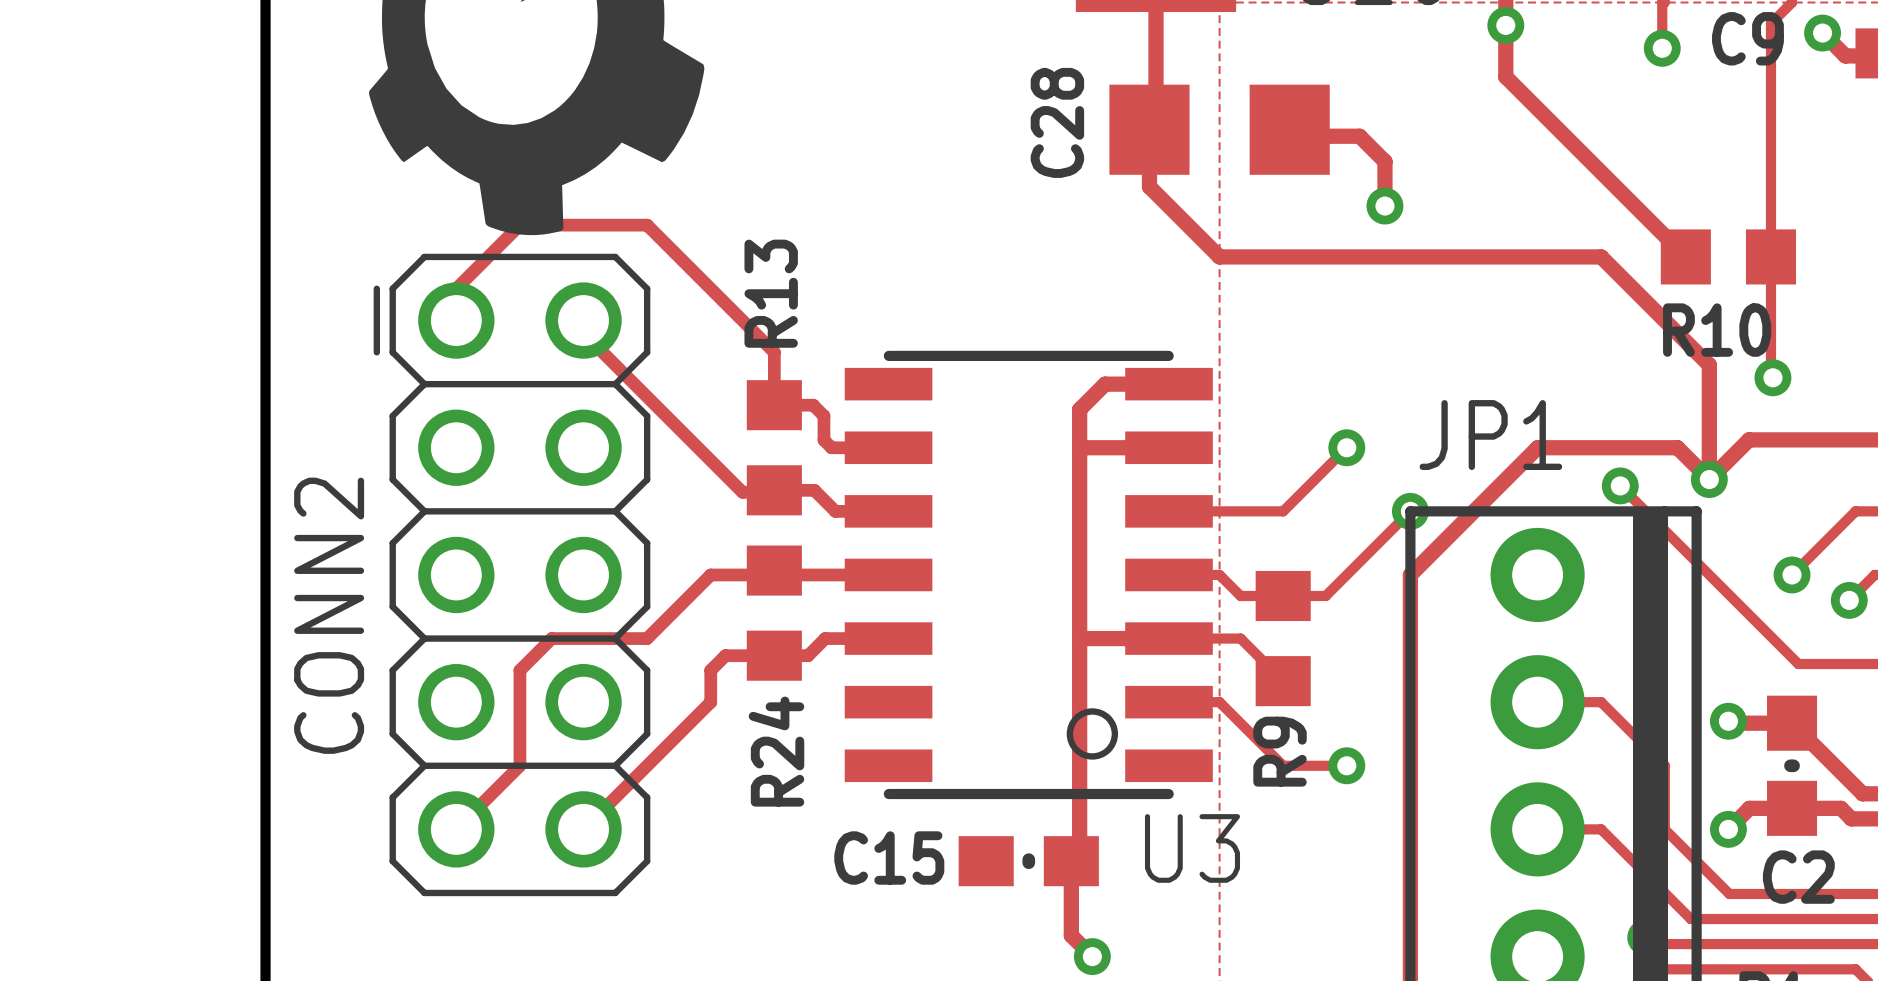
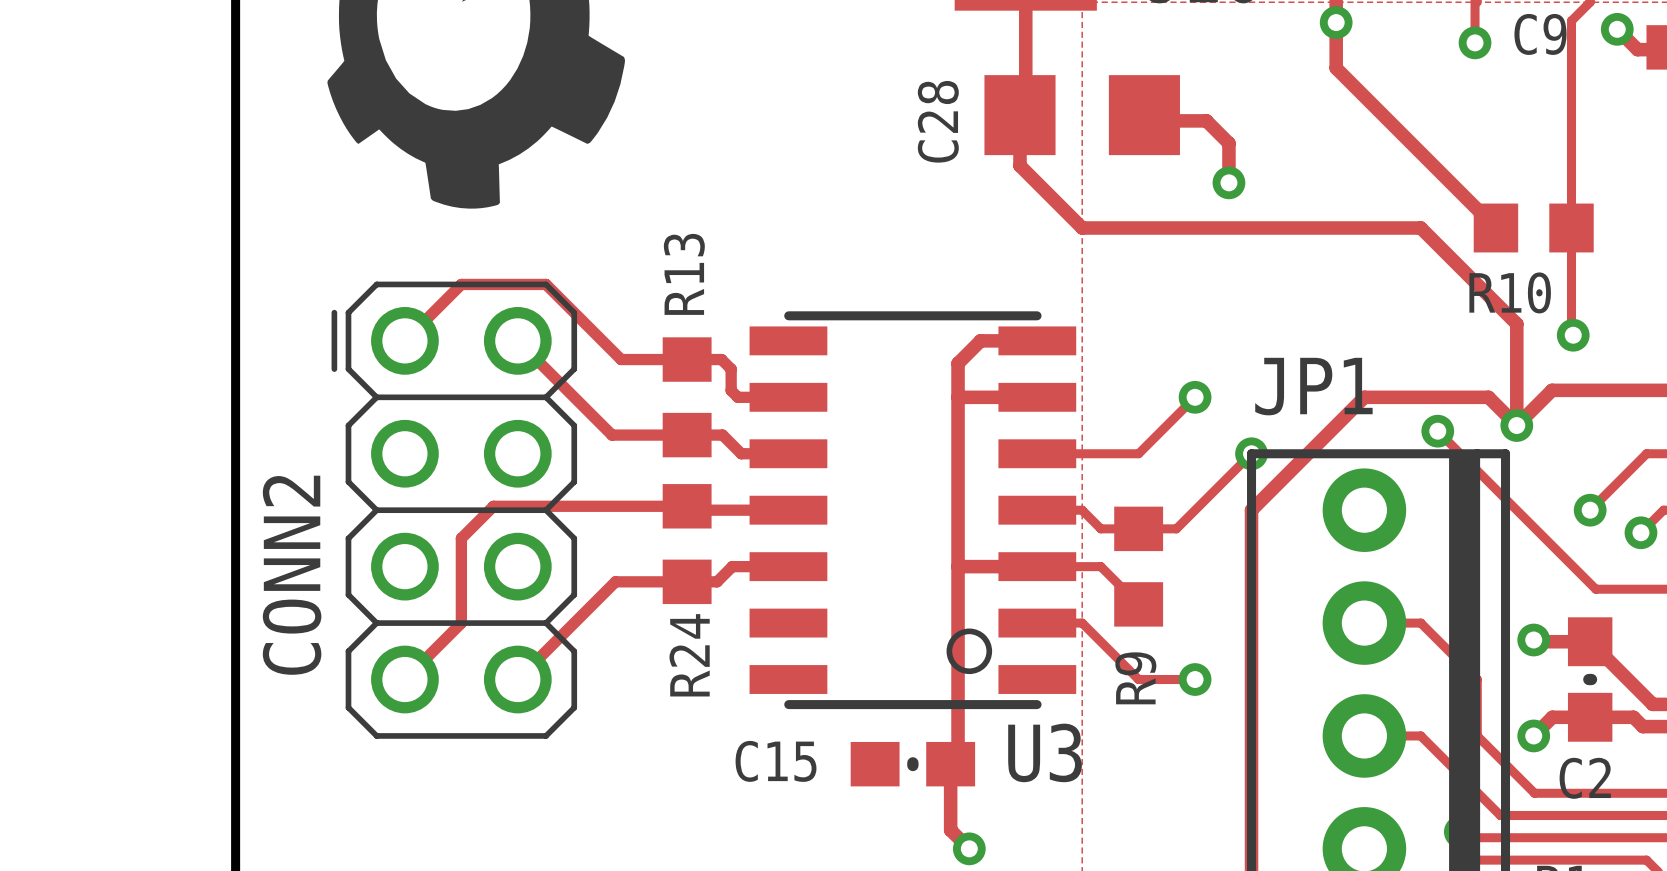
CONN2 footprint: [373, 253, 651, 897] -> [331, 281, 578, 739]
track: (456, 320) (456, 288) (519, 225) (647, 225) (774, 352) (774, 405) -> (404, 340) (461, 284) (546, 284) (621, 359) (687, 359)
track: (583, 320) (583, 333) (742, 492) (772, 492) (774, 490) -> (517, 340) (612, 435) (687, 435)
track: (774, 570) (769, 574) (710, 574) (647, 638) (551, 638) (519, 670) -> (687, 506) (493, 506) (461, 538) (461, 594)
track: (725, 655) (710, 670) (710, 702) (583, 829) -> (643, 581) (615, 581) (517, 679)
track: (519, 702) (519, 765) (456, 829) -> (461, 623) (404, 679)

